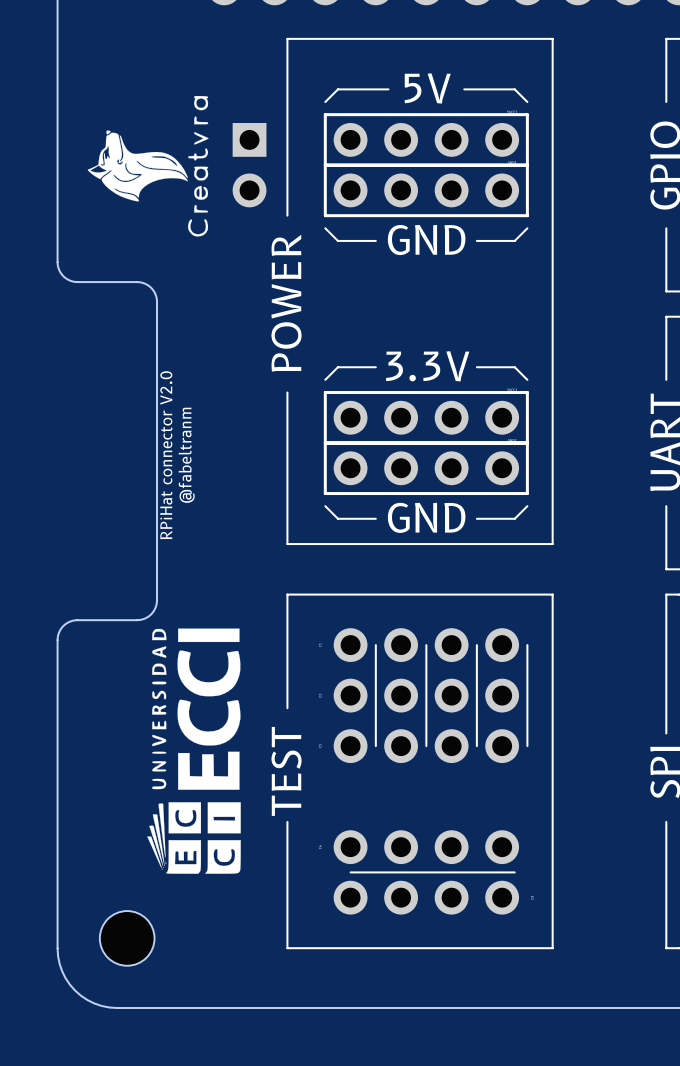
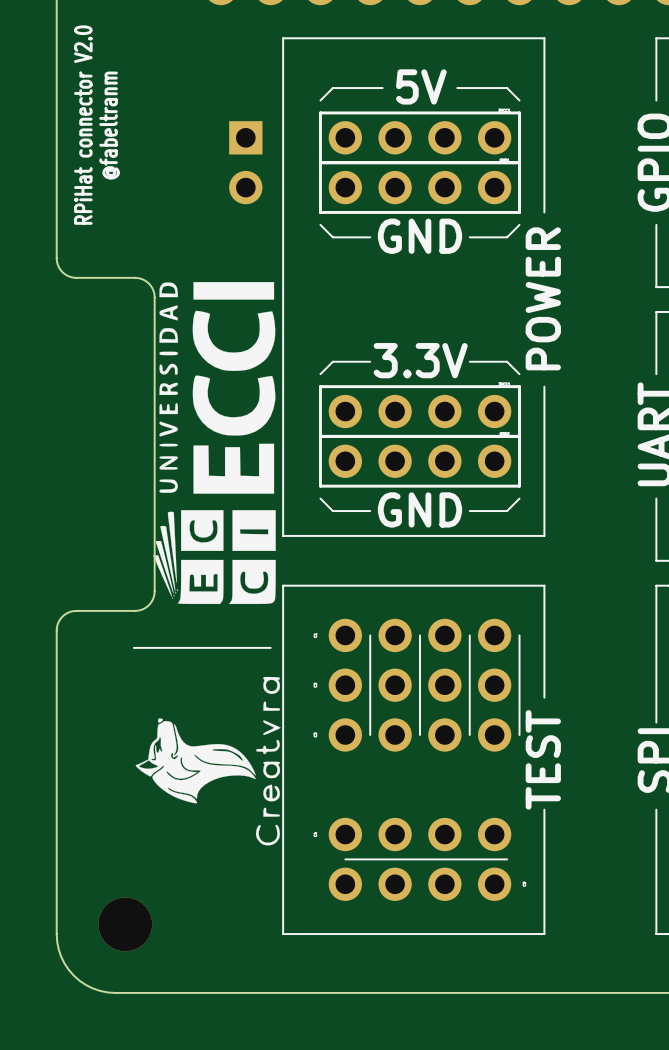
drawing: [87, 96, 209, 237] -> none
line: (552, 215) (552, 392) -> (283, 212) (283, 386)
drawing: none -> [153, 282, 276, 605]
text position: POWER (286, 303) -> POWER (543, 298)
text position: RPiHat connector V2.0 (166, 455) -> RPiHat connector V2.0 (83, 125)
text position: @fabeltranm (186, 455) -> @fabeltranm (109, 125)
drawing: [147, 628, 241, 874] -> none
line: none -> (133, 647) (270, 647)
drawing: none -> [135, 676, 281, 846]
line: (552, 708) (552, 821) -> (283, 697) (283, 809)
text position: TEST (286, 771) -> TEST (543, 759)
part footprint: [99, 911, 155, 966] -> [98, 897, 153, 952]

